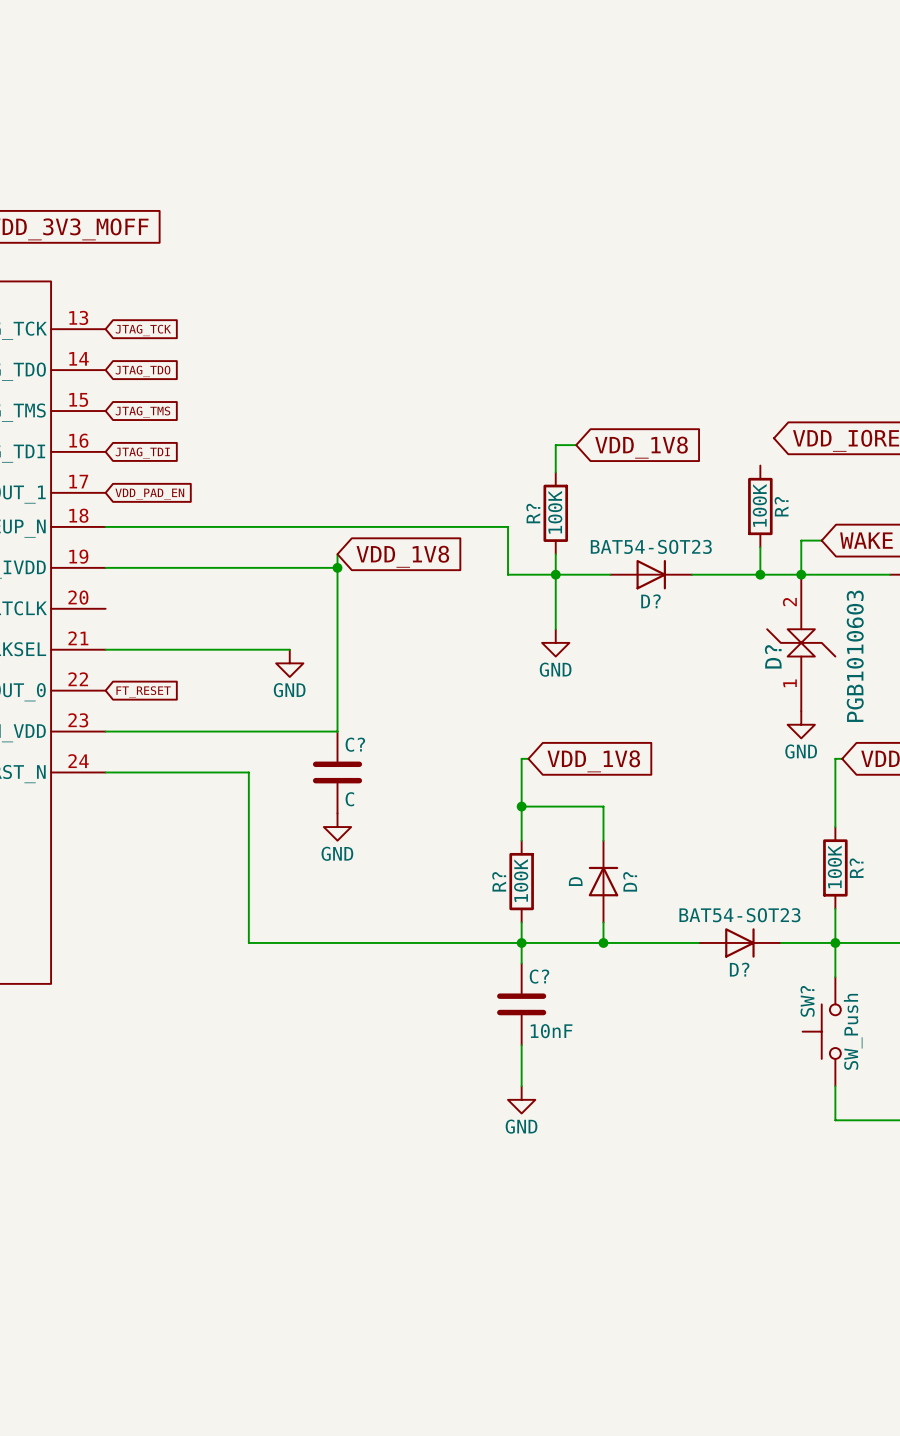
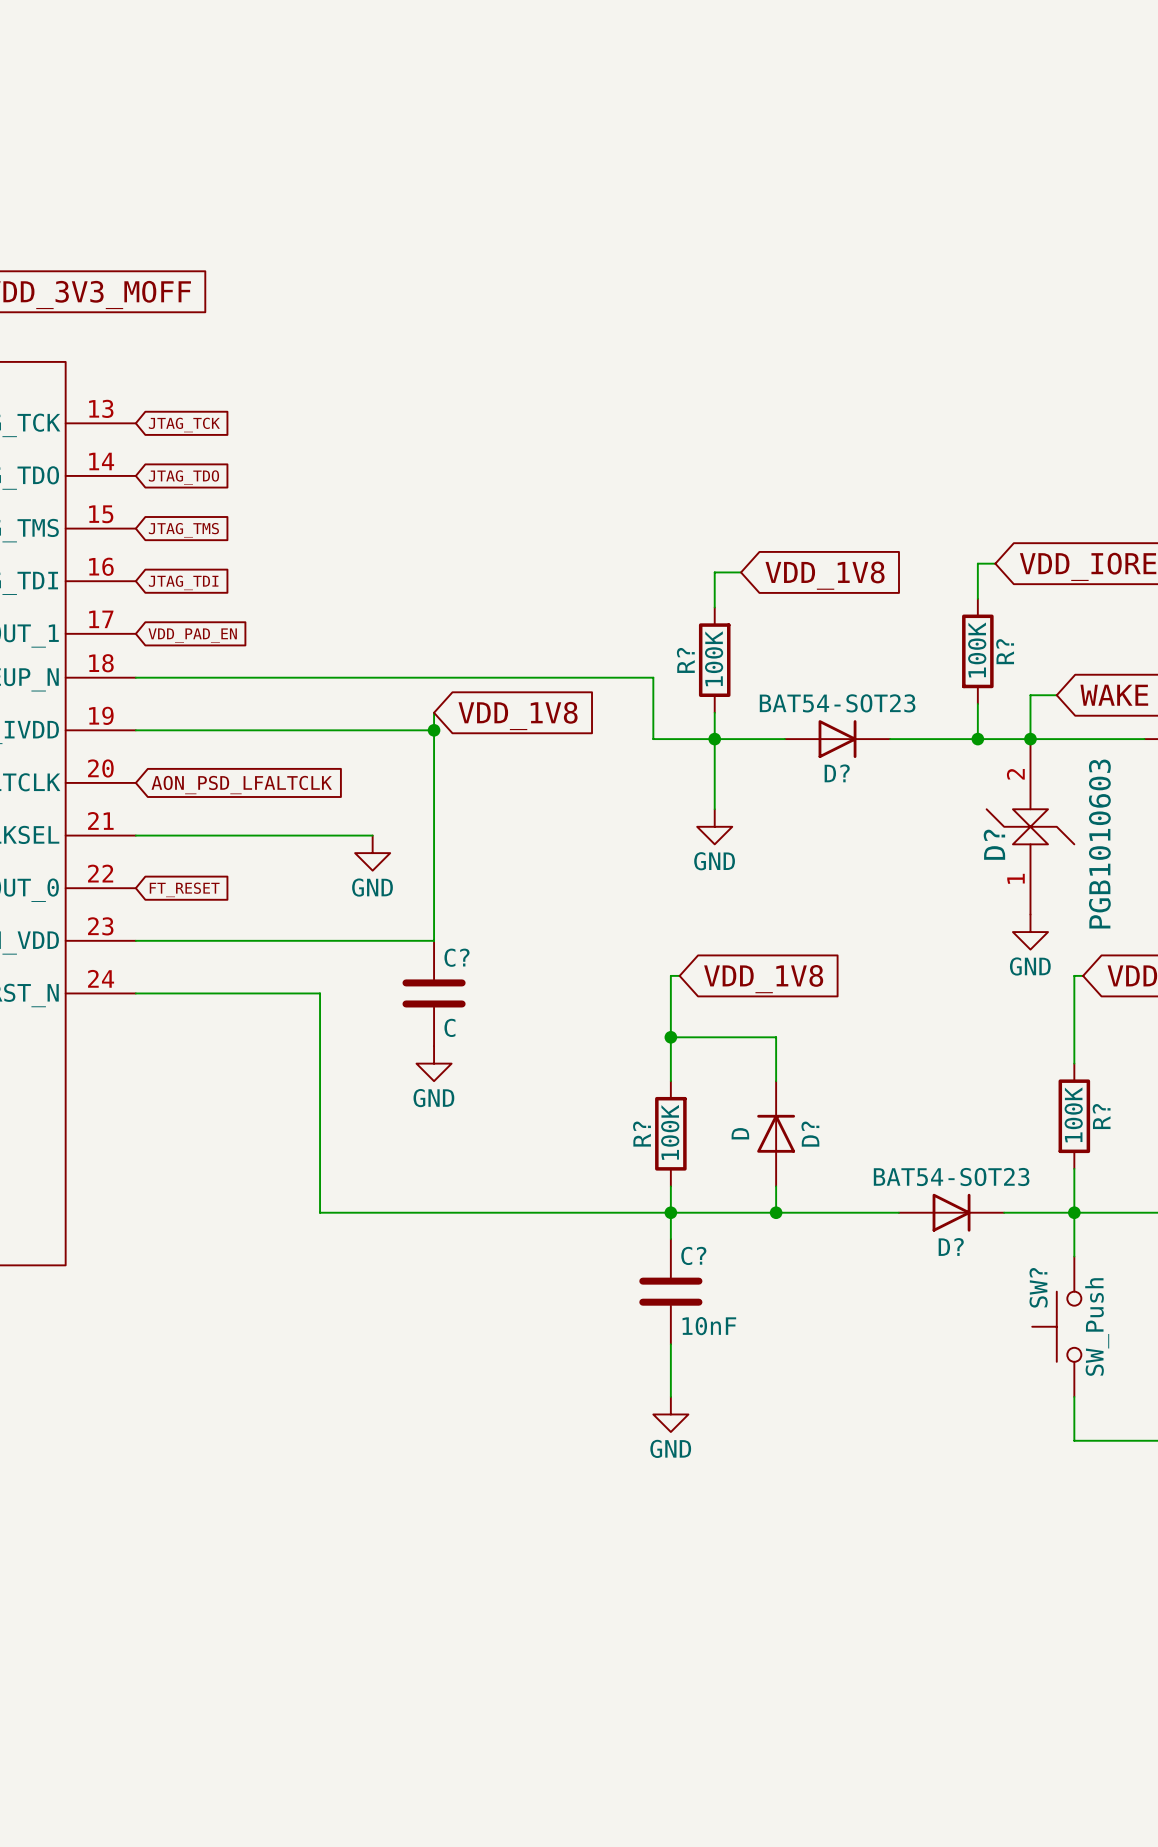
wire: none -> (995, 563) (977, 563) (977, 598)
global label: none -> AON_PSD_LFALTCLK (241, 785)

